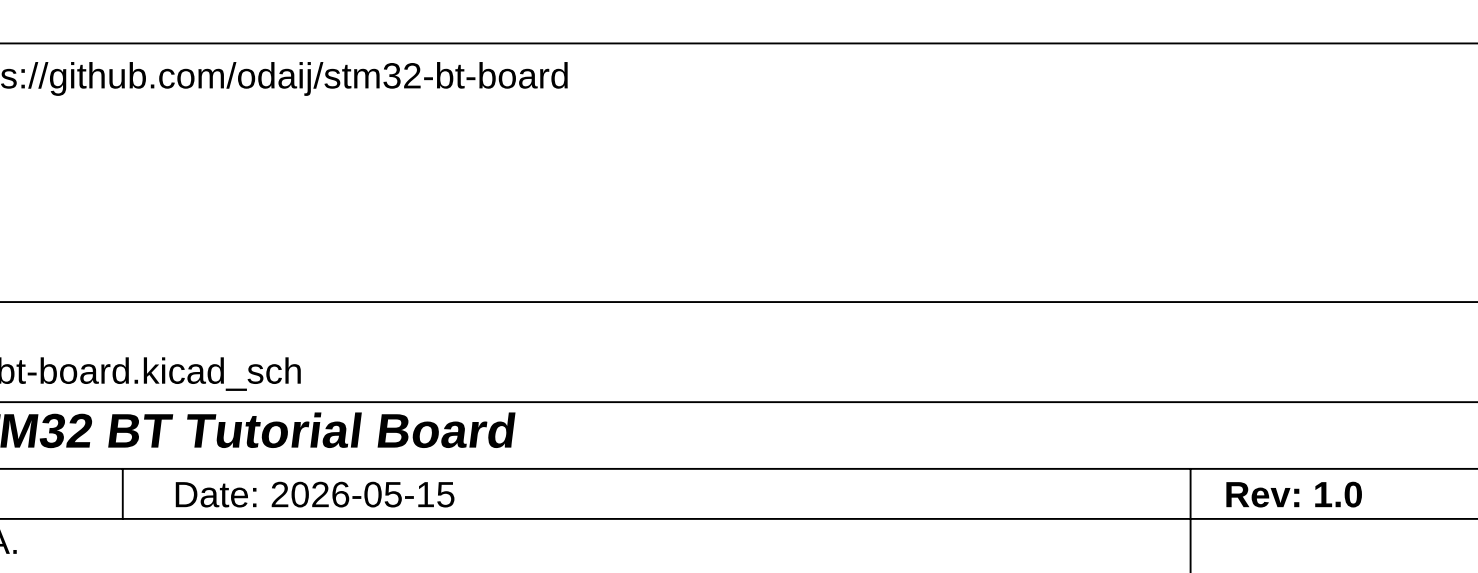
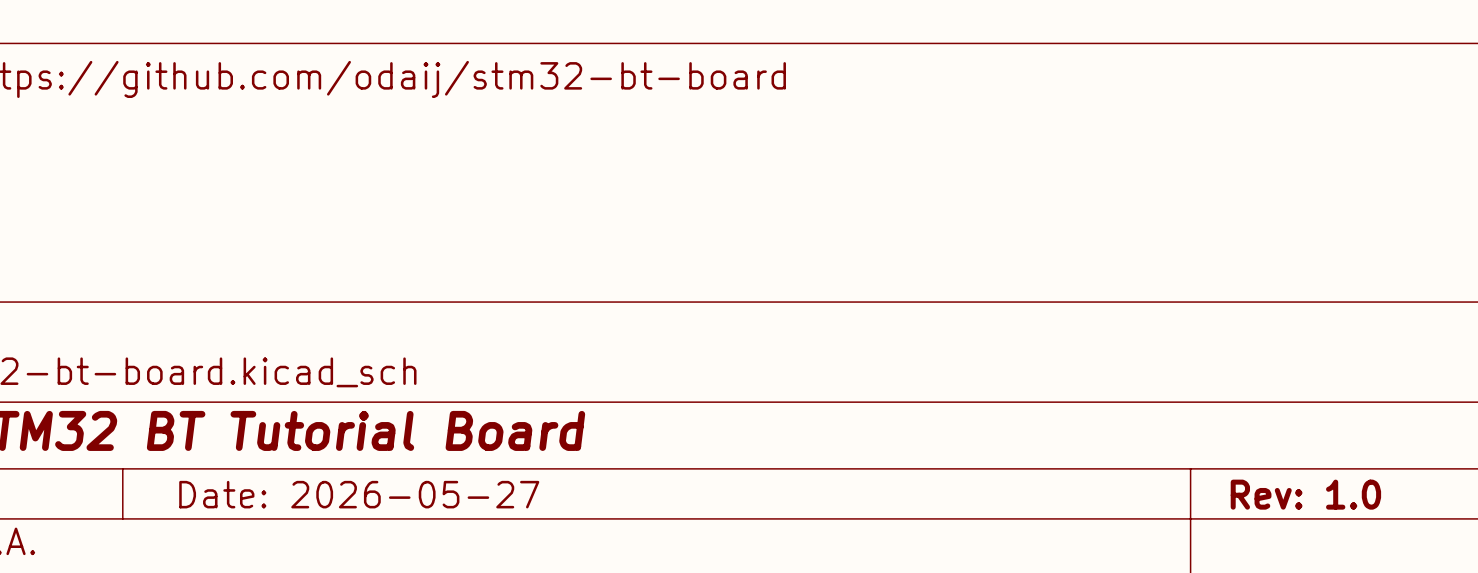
title block: Date: 2026-05-15 (315, 494) -> Date: 2026-05-27 (359, 494)

